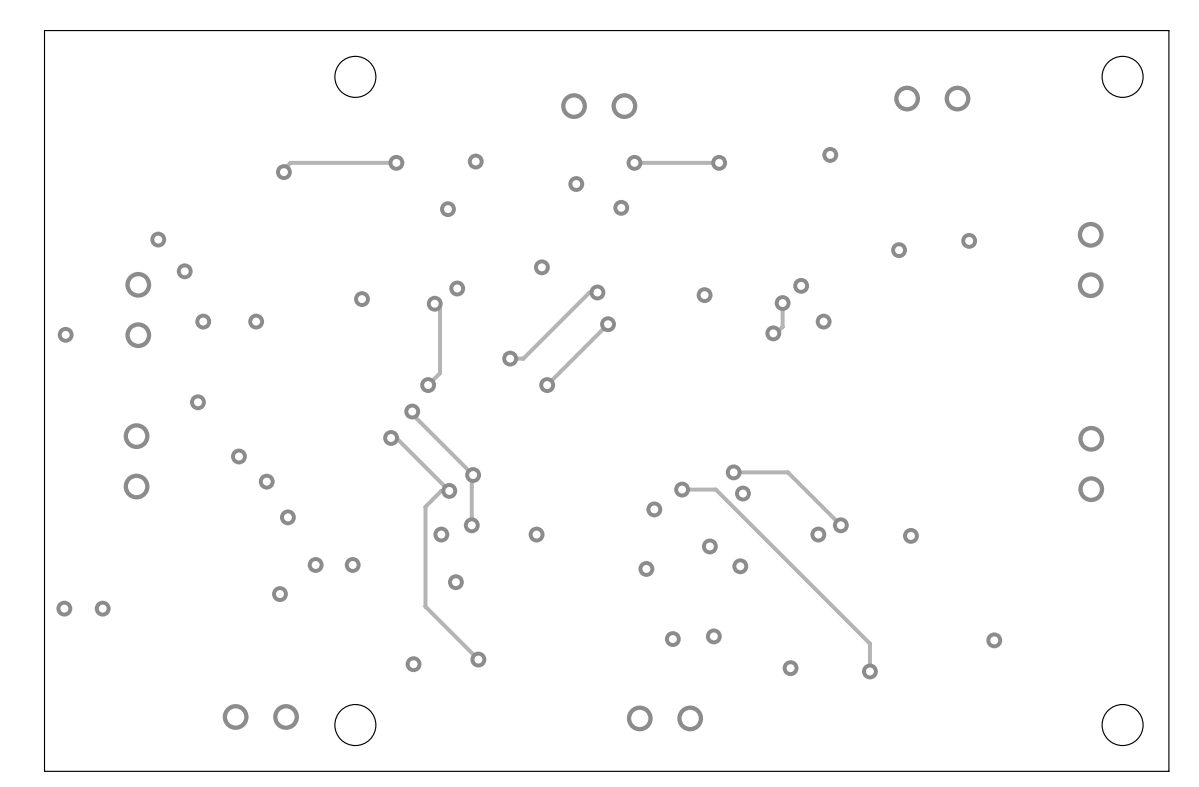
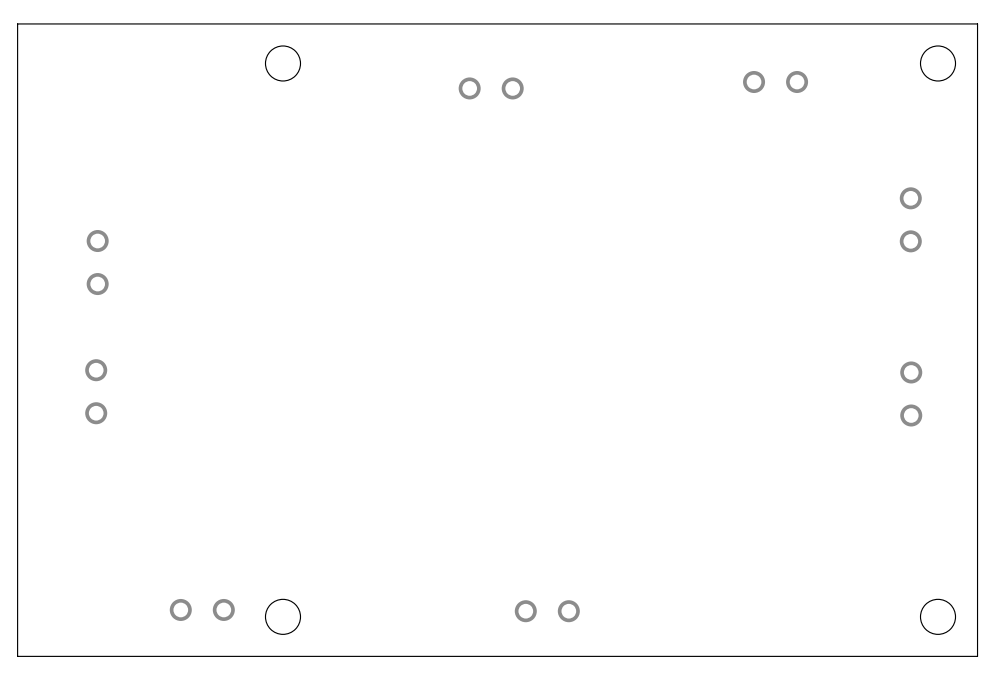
via: (830, 154) -> none
via: (475, 161) -> none
track: (396, 162) (290, 162) (282, 170) (283, 172) -> none
via: (396, 162) -> none
via: (634, 162) -> none
track: (719, 162) (634, 162) -> none
via: (719, 162) -> none
via: (283, 172) -> none
via: (576, 184) -> none
via: (621, 207) -> none
via: (447, 209) -> none
via: (158, 239) -> none
via: (969, 240) -> none
via: (899, 250) -> none
via: (541, 267) -> none
via: (184, 271) -> none
via: (801, 285) -> none
via: (457, 288) -> none
track: (597, 292) (589, 292) (523, 358) (510, 358) -> none
via: (597, 292) -> none
via: (704, 295) -> none
via: (361, 299) -> none
track: (434, 303) (440, 309) (440, 373) (428, 385) -> none
via: (434, 303) -> none
track: (782, 303) (782, 326) (774, 334) (773, 333) -> none
via: (782, 303) -> none
via: (203, 321) -> none
via: (256, 321) -> none
via: (823, 321) -> none
track: (608, 324) (547, 385) -> none
via: (608, 324) -> none
via: (773, 333) -> none
via: (65, 334) -> none
via: (510, 358) -> none
via: (428, 385) -> none
via: (547, 385) -> none
via: (197, 402) -> none
track: (412, 411) (412, 414) (473, 475) (471, 525) -> none
via: (412, 411) -> none
track: (391, 437) (396, 437) (449, 490) (441, 490) (425, 506) (425, 606) (478, 659) -> none
via: (391, 437) -> none
via: (238, 456) -> none
track: (733, 472) (787, 472) (840, 525) -> none
via: (733, 472) -> none
via: (473, 475) -> none
via: (266, 481) -> none
track: (682, 489) (715, 489) (869, 643) (869, 671) -> none
via: (682, 489) -> none
via: (449, 490) -> none
via: (742, 493) -> none
via: (654, 509) -> none
via: (287, 517) -> none
via: (471, 525) -> none
via: (840, 525) -> none
via: (441, 534) -> none
via: (536, 534) -> none
via: (818, 534) -> none
via: (910, 535) -> none
via: (709, 546) -> none
via: (315, 564) -> none
via: (352, 564) -> none
via: (740, 566) -> none
via: (646, 568) -> none
via: (455, 582) -> none
via: (279, 594) -> none
via: (64, 608) -> none
via: (102, 608) -> none
via: (713, 636) -> none
via: (672, 639) -> none
via: (994, 640) -> none
via: (478, 659) -> none
via: (413, 664) -> none
via: (790, 668) -> none
via: (869, 671) -> none

